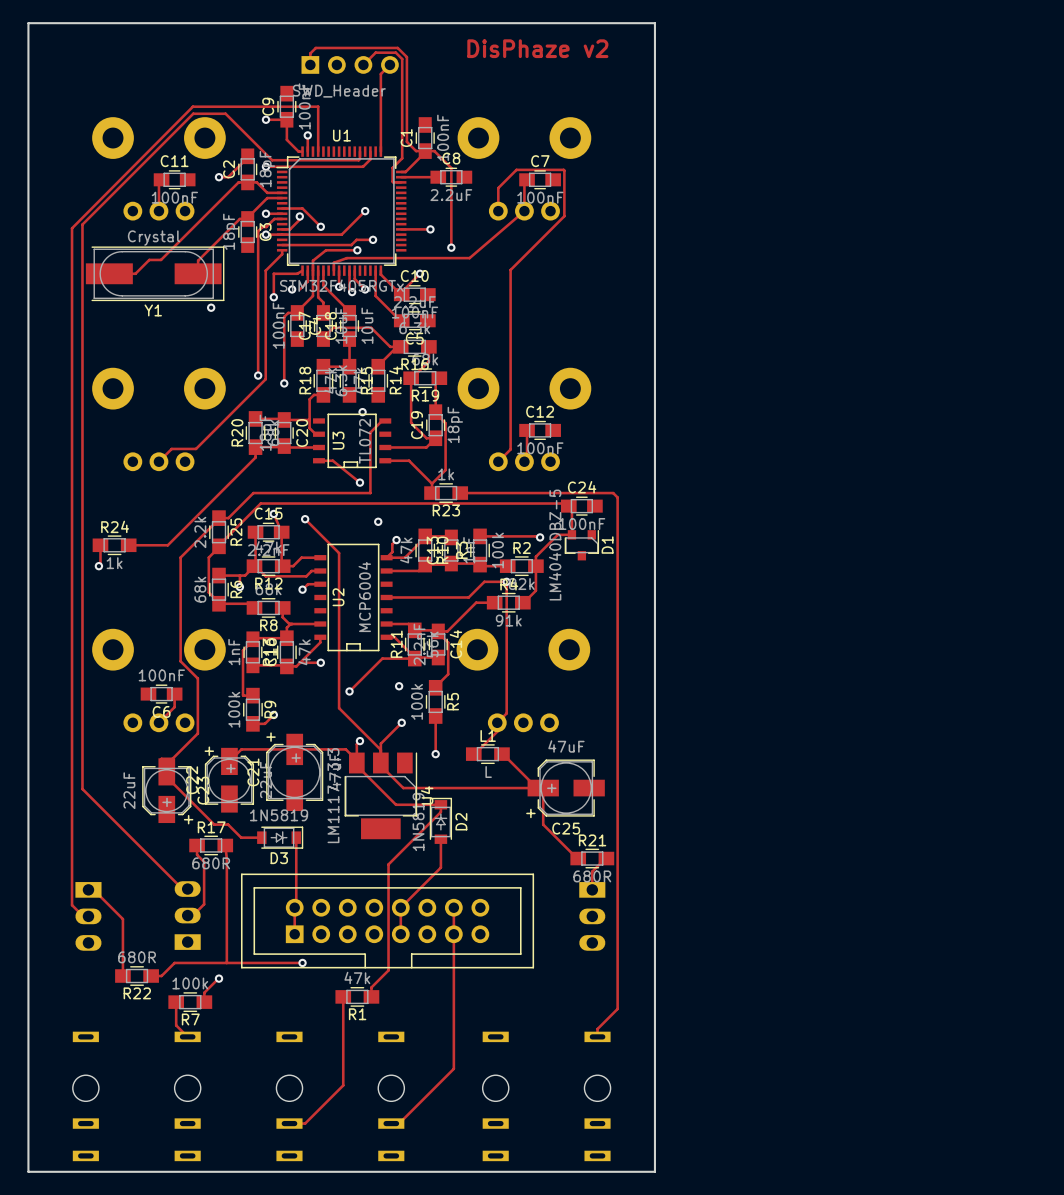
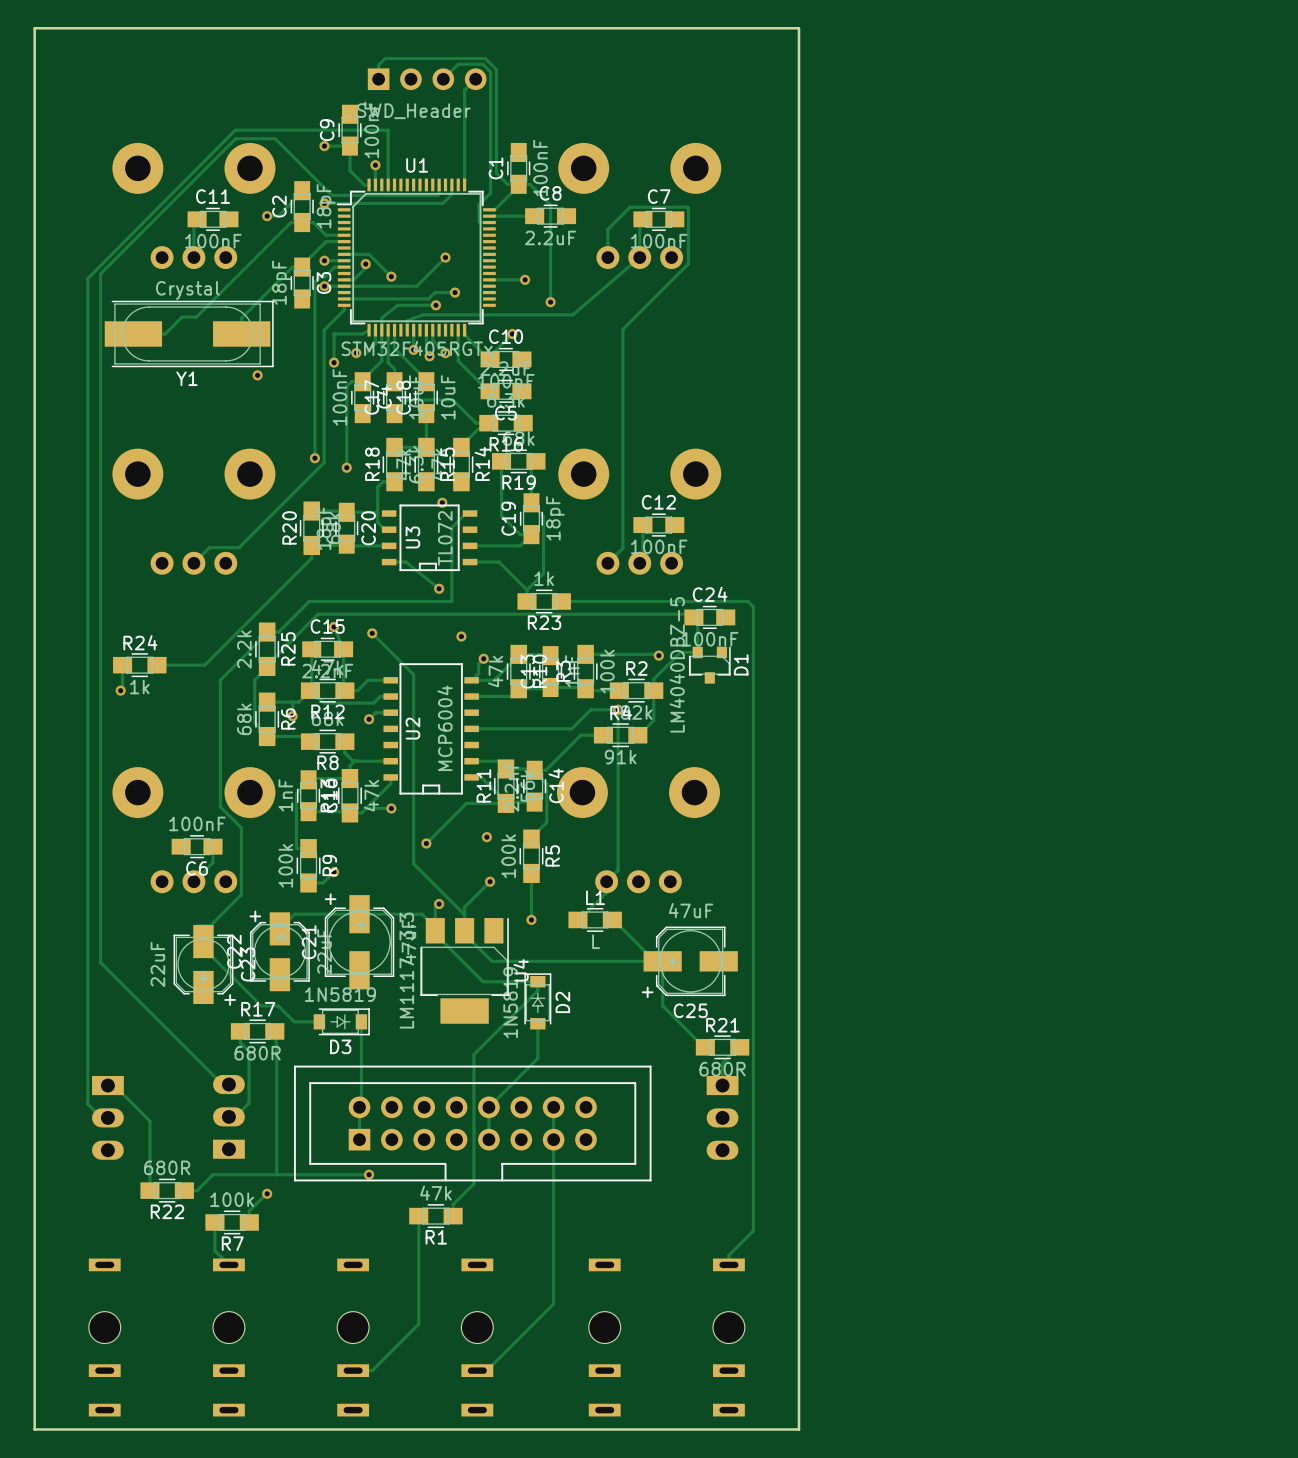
text: DisPhaze v2 (537, 48) -> none

